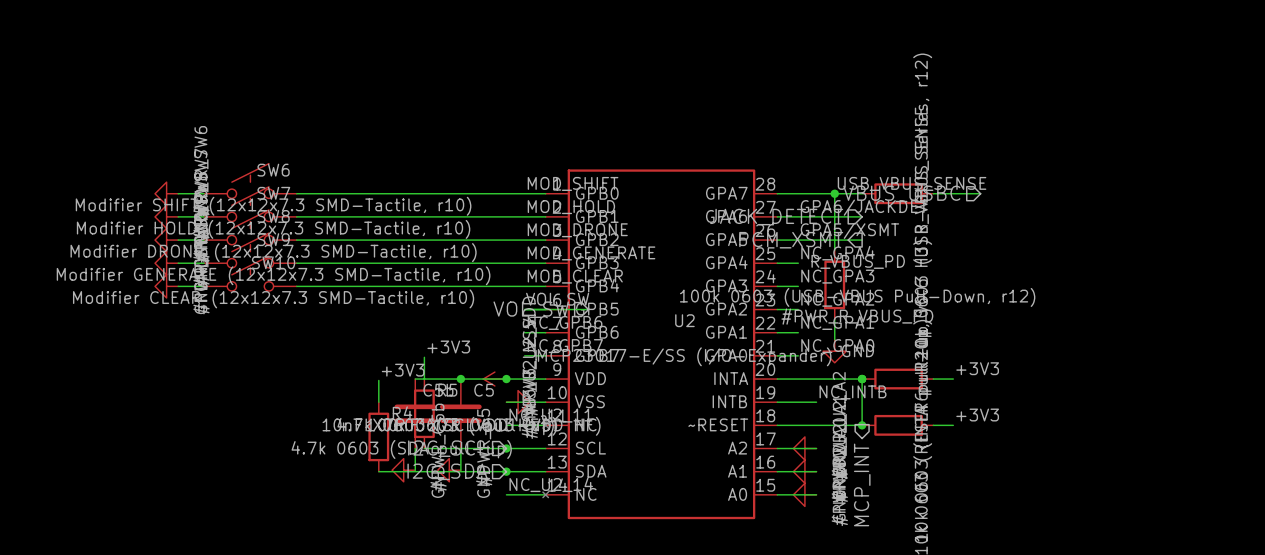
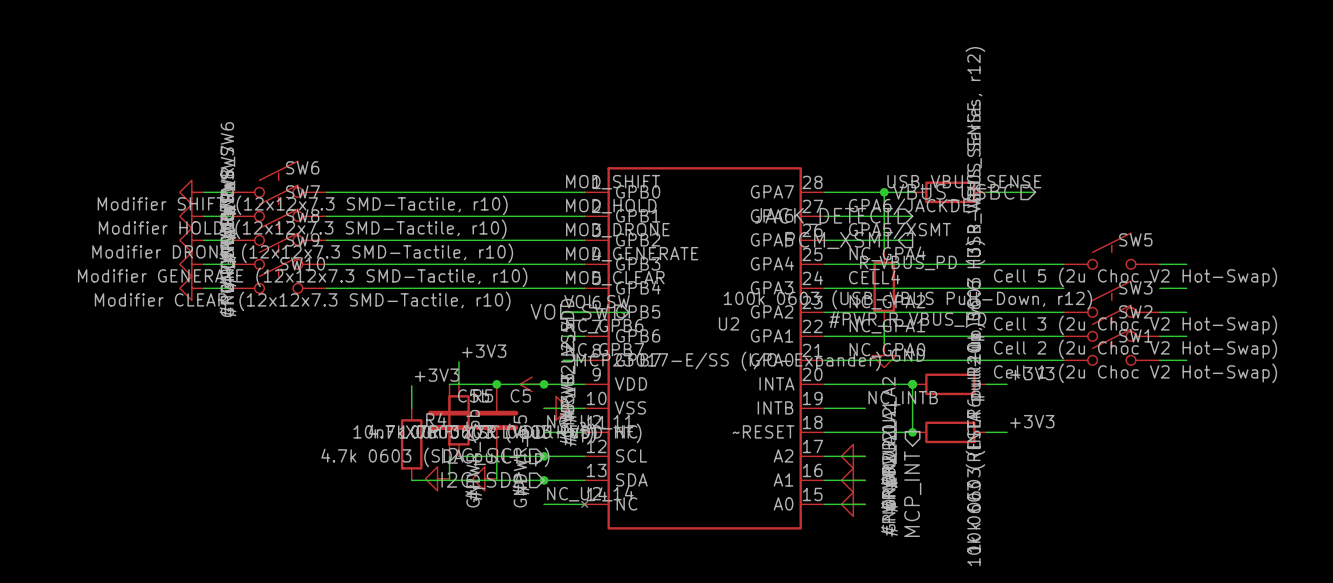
SW5: none -> Cell 5 (2u Choc V2 Hot-Swap) (1111, 251)
wire: none -> (846, 264) (1063, 264)
wire: none -> (1159, 264) (1186, 264)
label: NC_GPA3 (837, 276) -> CELL4 (874, 277)
wire: none -> (846, 288) (1063, 288)
wire: none -> (1159, 288) (1186, 288)
SW3: none -> Cell 3 (2u Choc V2 Hot-Swap) (1111, 299)
wire: none -> (846, 312) (1063, 312)
wire: none -> (1159, 312) (1186, 312)
SW2: none -> Cell 2 (2u Choc V2 Hot-Swap) (1111, 323)
wire: none -> (846, 336) (1063, 336)
wire: none -> (1159, 336) (1186, 336)
SW1: none -> Cell 1 (2u Choc V2 Hot-Swap) (1111, 347)
wire: none -> (846, 360) (1063, 360)
wire: none -> (1159, 360) (1186, 360)

